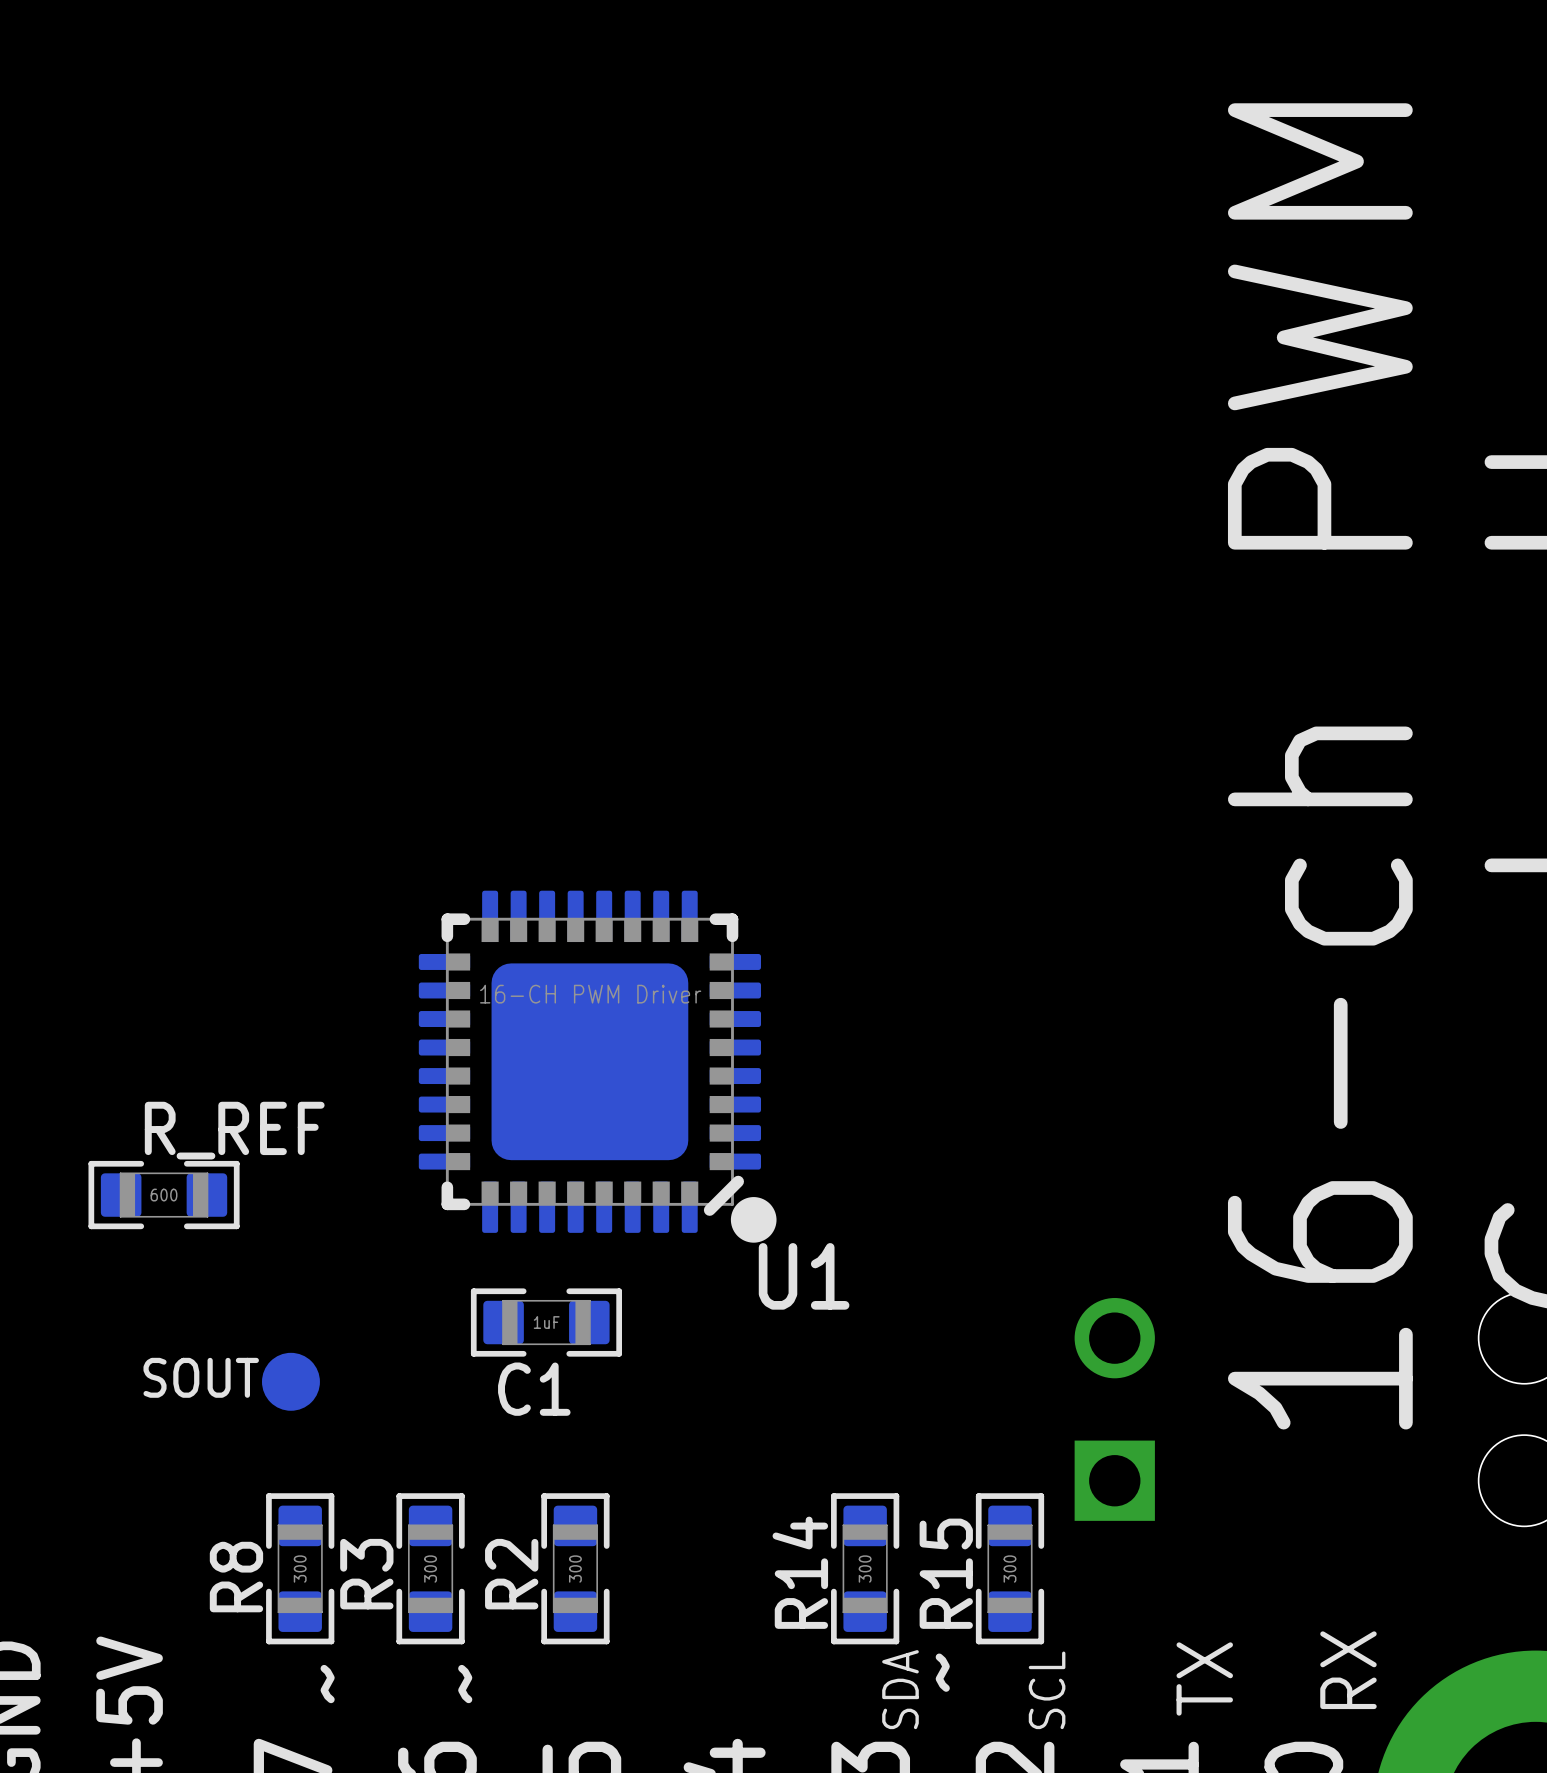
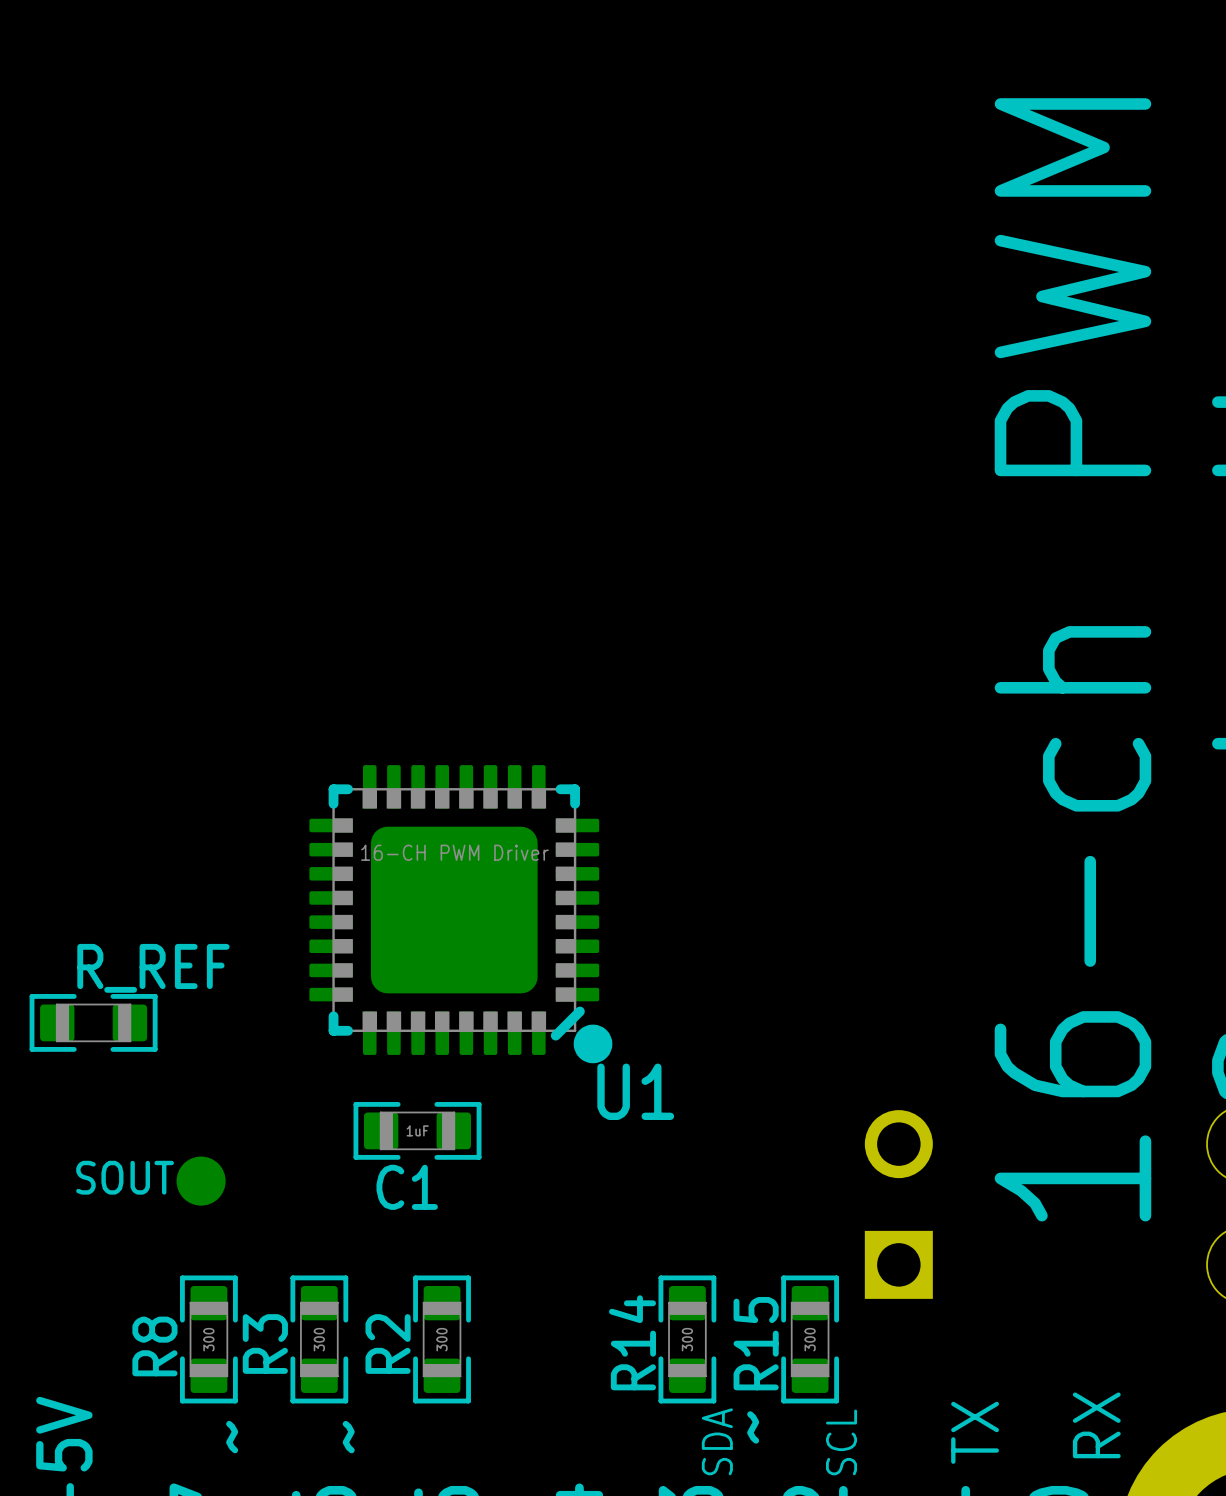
R_REF value: 600 (164, 1195) -> none

